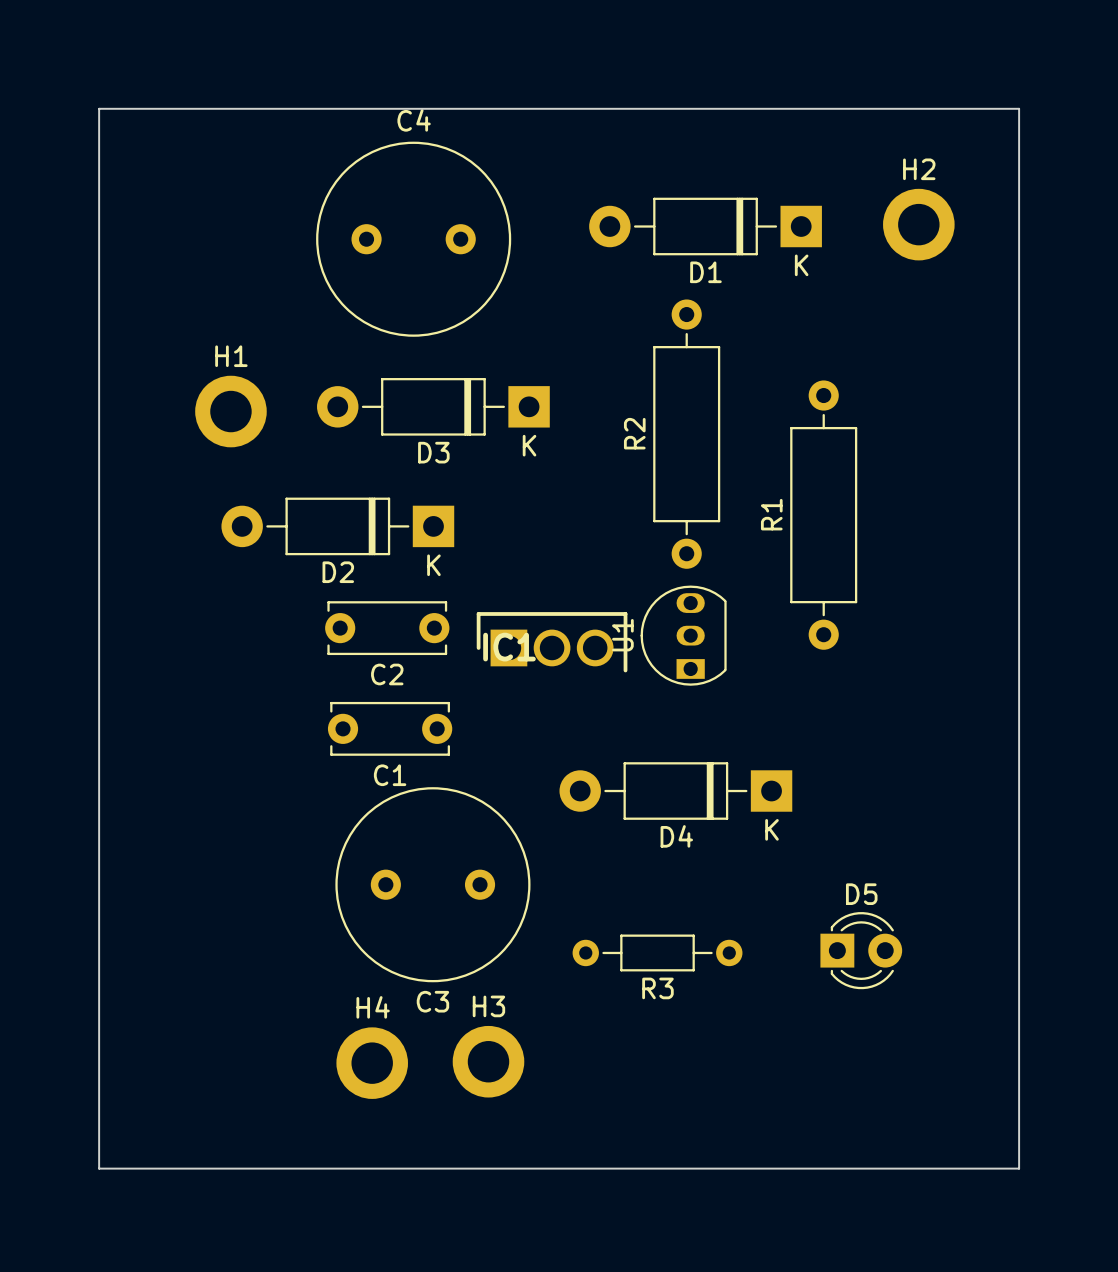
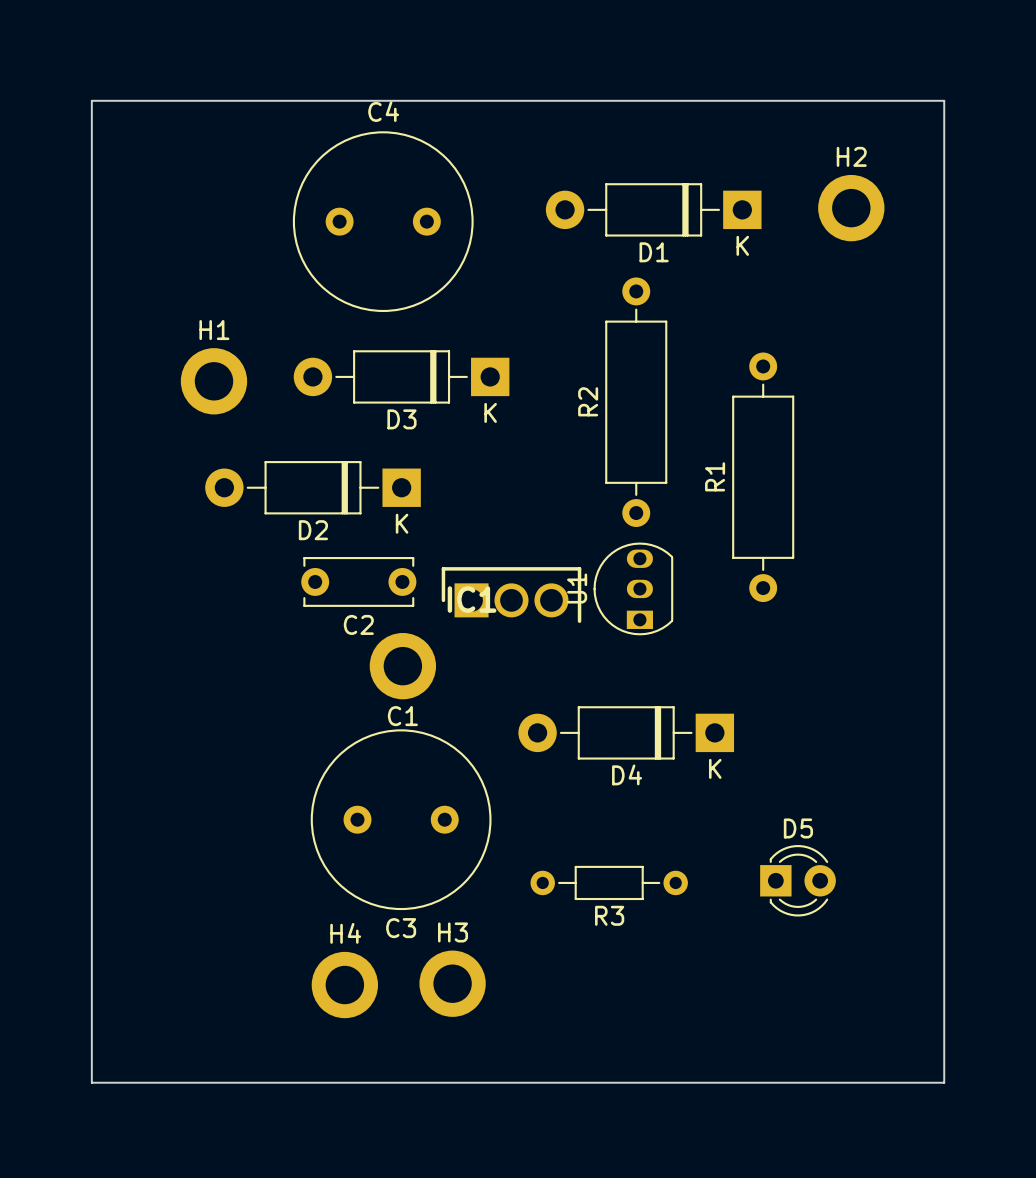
C1 footprint: [327, 701, 453, 756] -> [369, 632, 437, 700]

